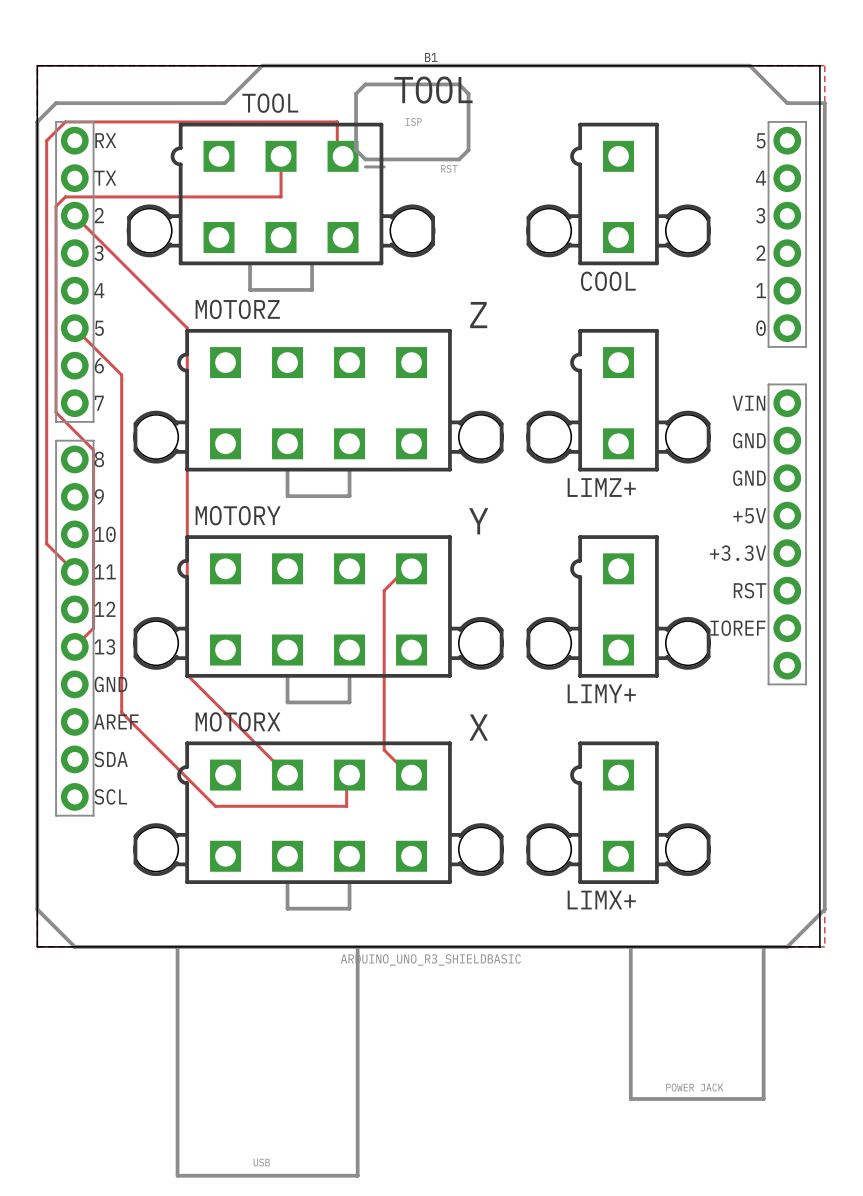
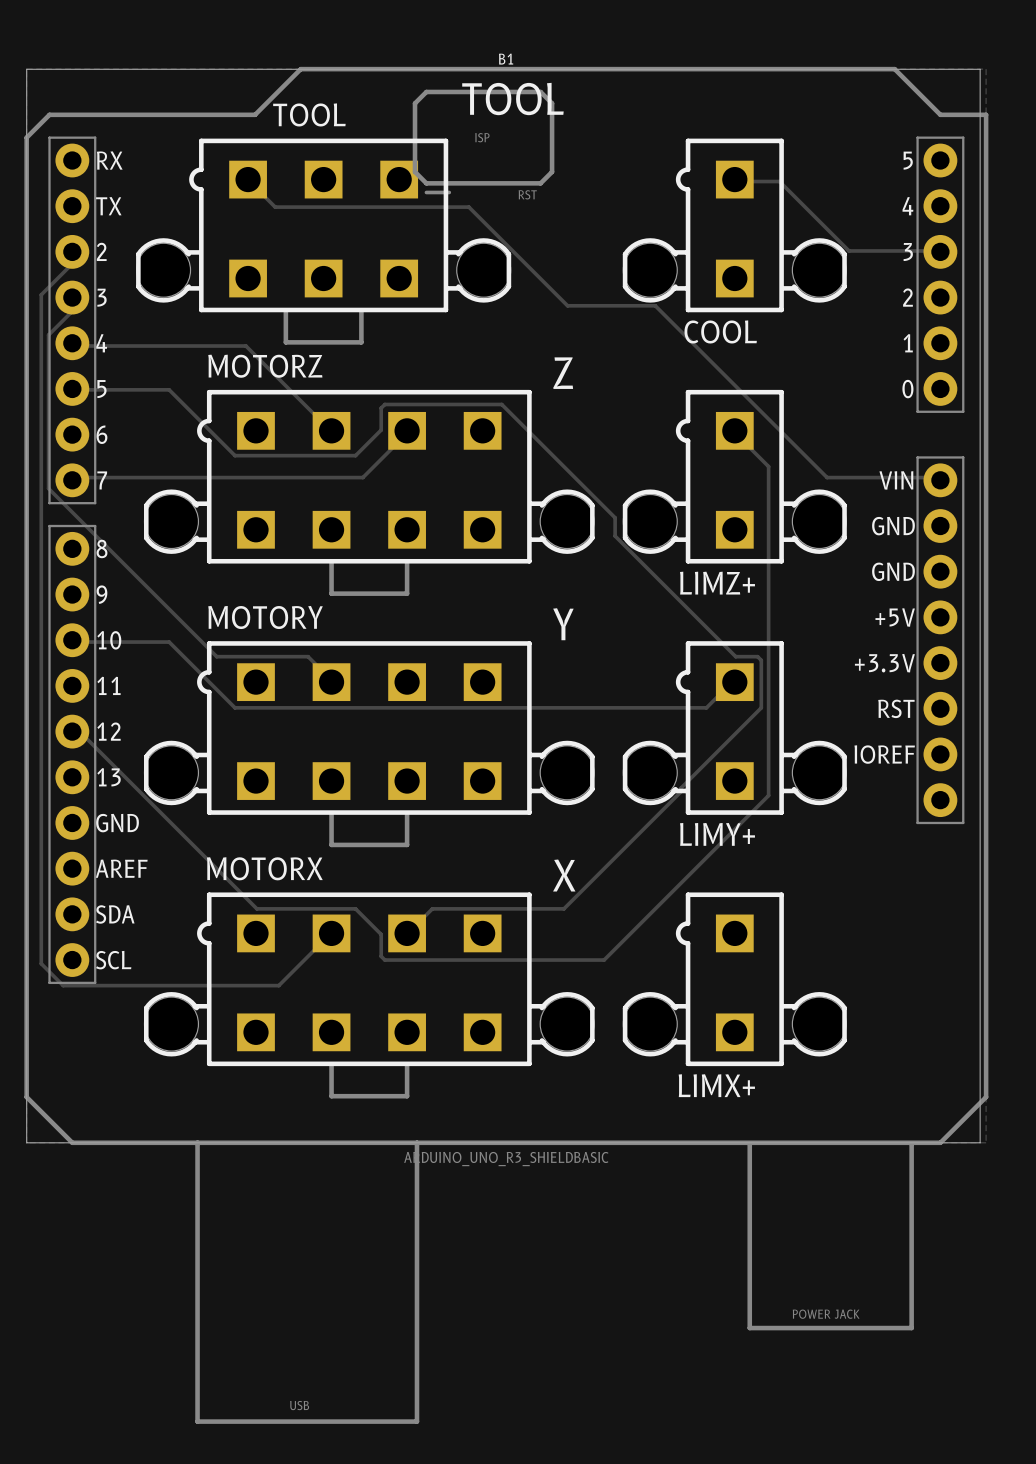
track: none -> (248, 179) (275, 207) (468, 207) (567, 305) (655, 305) (827, 477) (940, 477) (940, 480)
track: (281, 156) (281, 196) (65, 196) (56, 206) (56, 412) (93, 450) (93, 628) (74, 646) -> none
track: (343, 156) (337, 150) (337, 121) (65, 121) (46, 140) (46, 543) (74, 571) -> none
track: none -> (734, 179) (735, 181) (779, 181) (849, 250) (940, 251)
track: (74, 215) (187, 328) (187, 675) (287, 775) -> (72, 251) (70, 265) (41, 294) (41, 963) (63, 985) (278, 985) (331, 933)
track: none -> (72, 297) (70, 298) (70, 313) (48, 335) (48, 488) (216, 656) (308, 656) (331, 682)
track: none -> (72, 343) (74, 346) (245, 346) (331, 430)
track: (74, 328) (121, 375) (121, 712) (215, 806) (346, 806) (346, 778) (349, 775) -> (72, 388) (169, 389) (234, 455) (355, 455) (381, 430) (381, 408) (384, 404) (501, 404) (615, 517) (615, 536) (735, 656) (757, 656) (761, 660) (761, 707) (680, 788) (680, 791) (563, 908) (432, 908) (407, 933)
track: none -> (407, 430) (406, 433) (362, 477) (74, 477) (72, 480)
track: none -> (734, 430) (768, 466) (768, 795) (604, 960) (384, 960) (381, 956) (381, 934) (355, 908) (256, 908) (81, 733) (72, 731)
track: none -> (72, 640) (74, 642) (169, 642) (234, 707) (706, 707) (732, 682) (734, 682)
track: (411, 568) (402, 571) (384, 590) (384, 750) (411, 775) -> none

